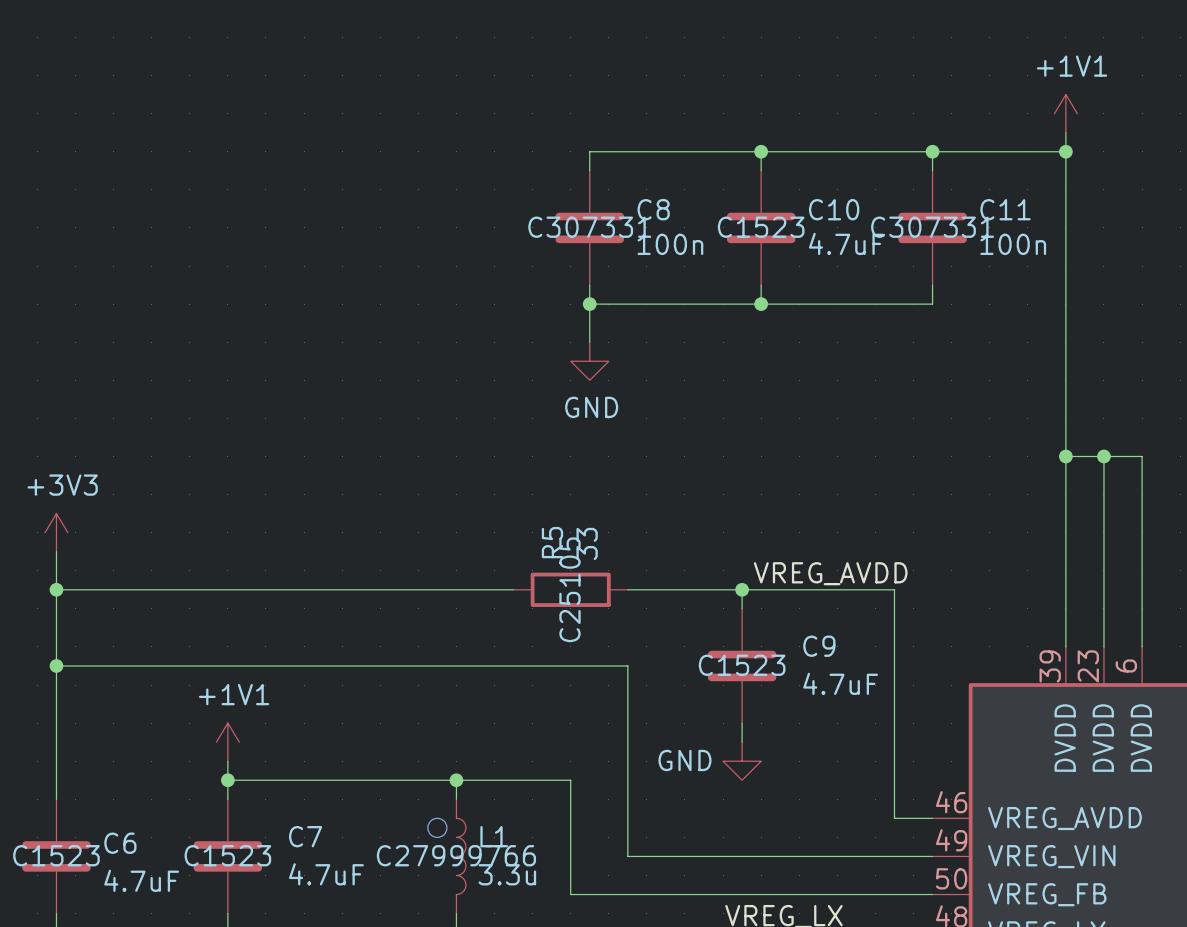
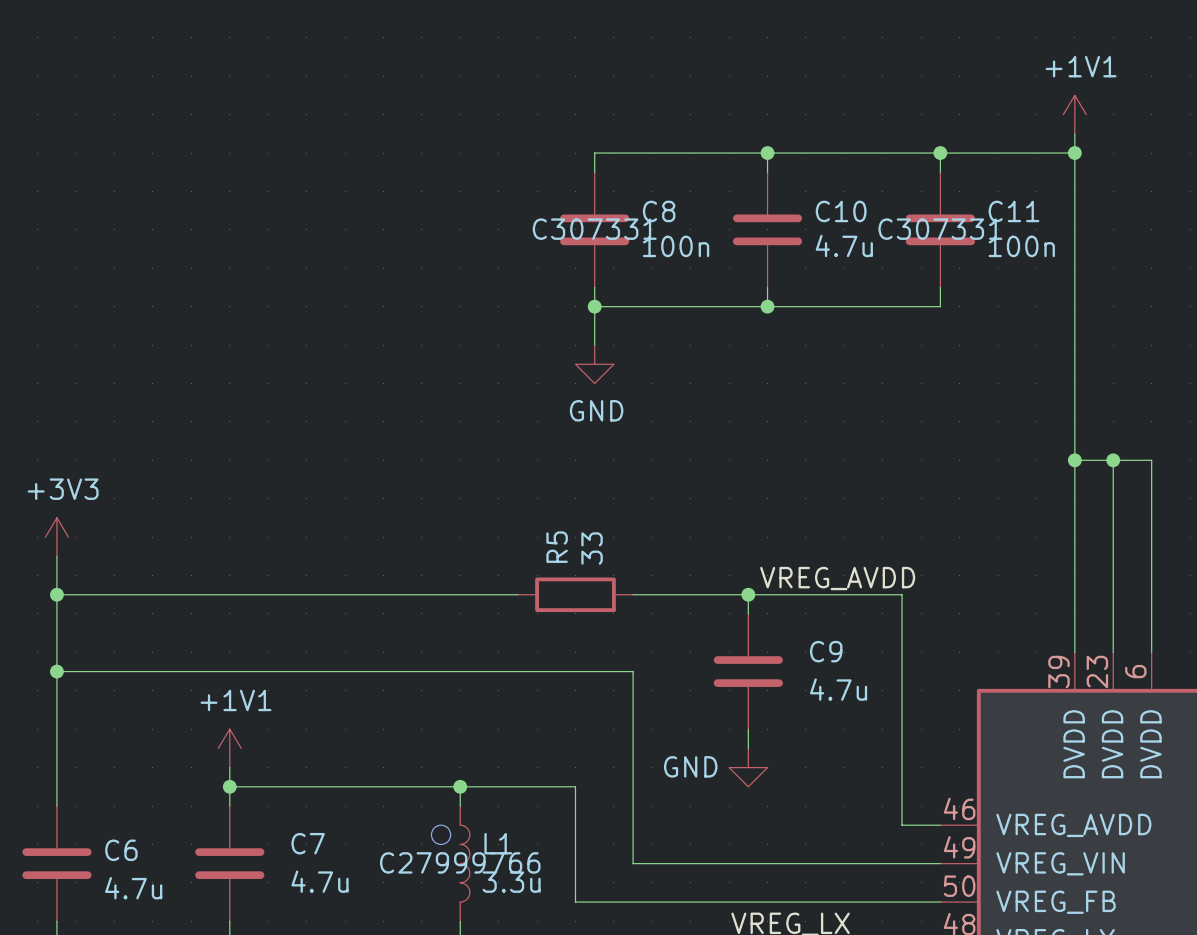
C10 text: C1523 (761, 227) -> none
C10 value: 4.7uF (846, 243) -> 4.7u (844, 245)
R5 text: C25105 (569, 589) -> none
C9 text: C1523 (742, 665) -> none
C9 value: 4.7uF (840, 683) -> 4.7u (838, 689)
C6 text: C1523 (56, 855) -> none
C7 text: C1523 (227, 855) -> none
C7 value: 4.7uF (326, 874) -> 4.7u (320, 881)
C6 value: 4.7uF (141, 880) -> 4.7u (133, 888)

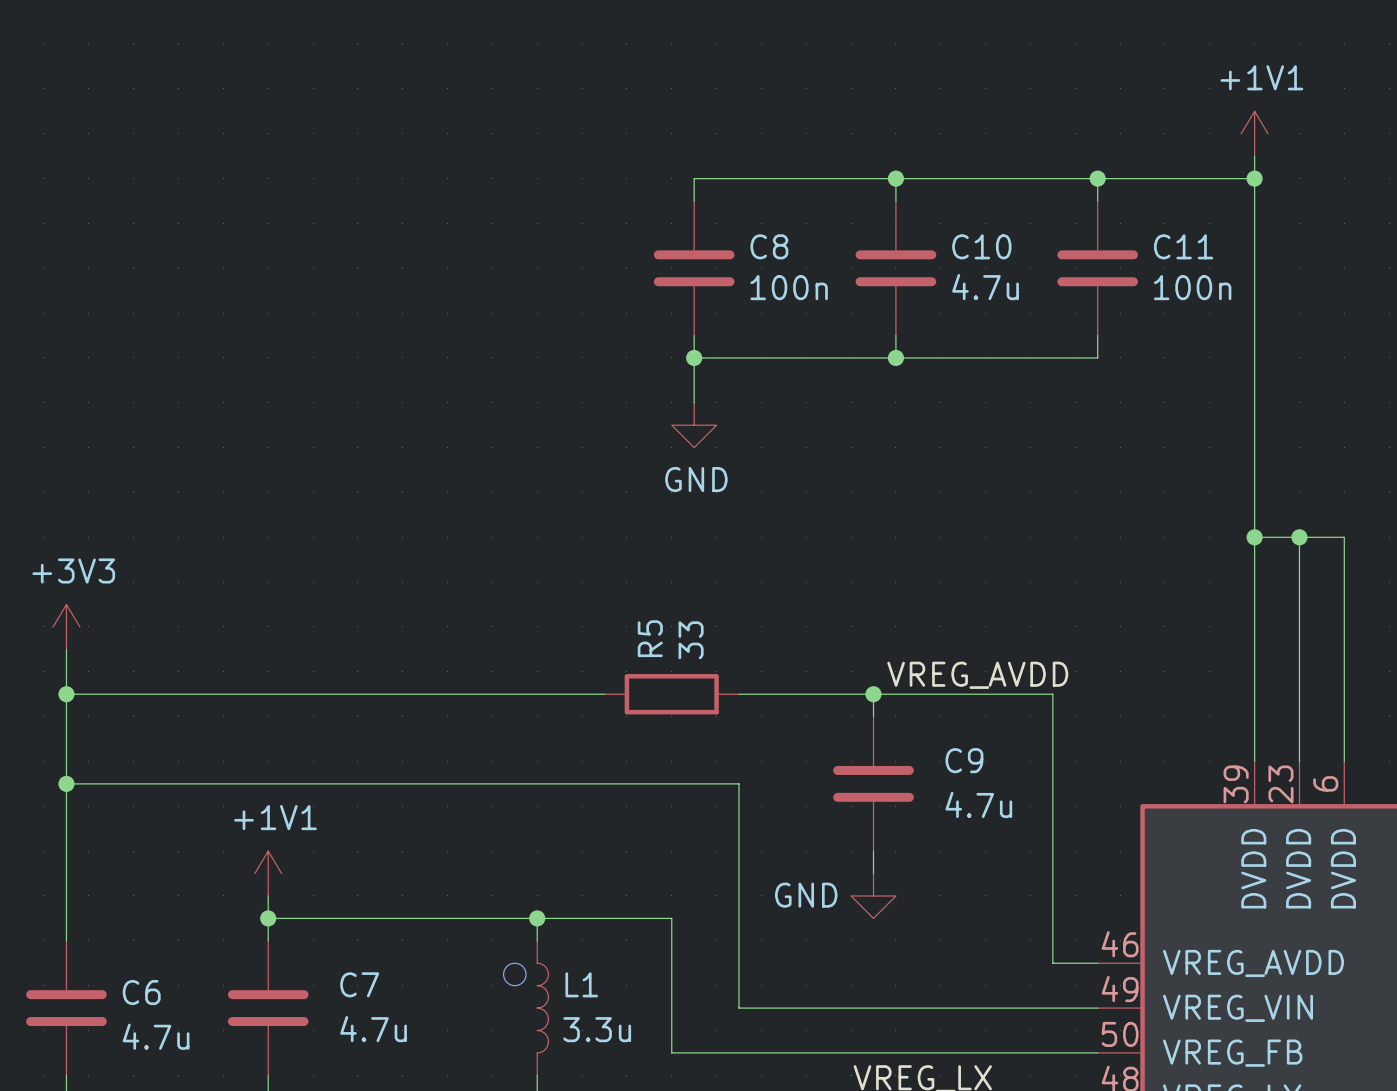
C8 text: C307331 (594, 229) -> none
C11 text: C307331 (940, 229) -> none
L1 text: C27999766 (460, 862) -> none

